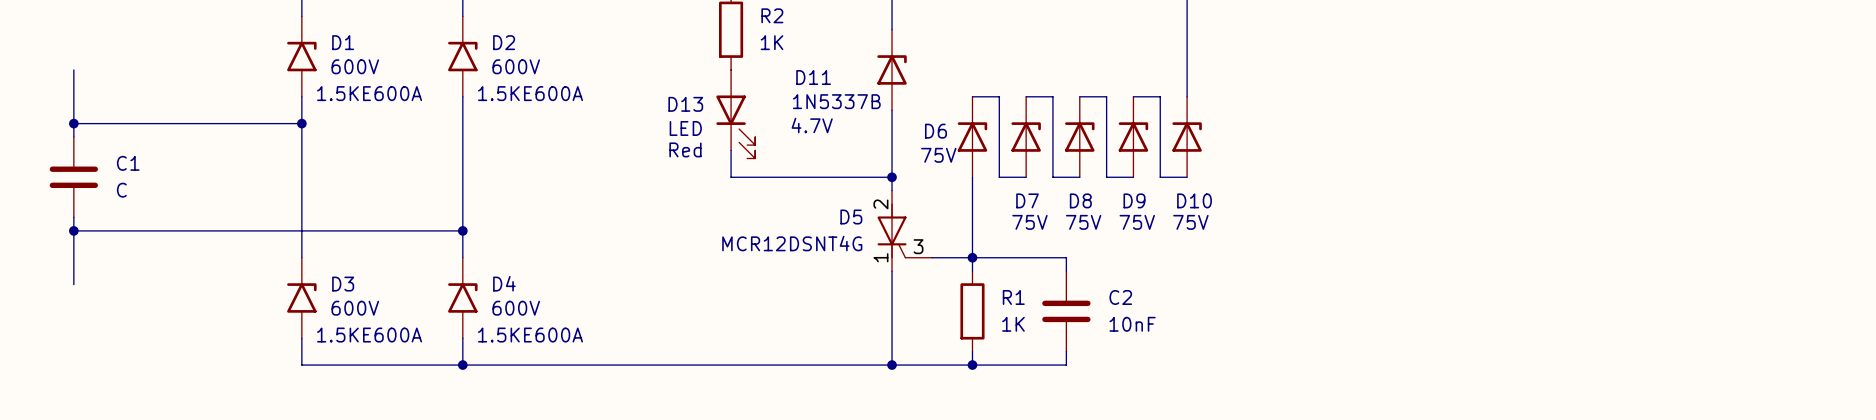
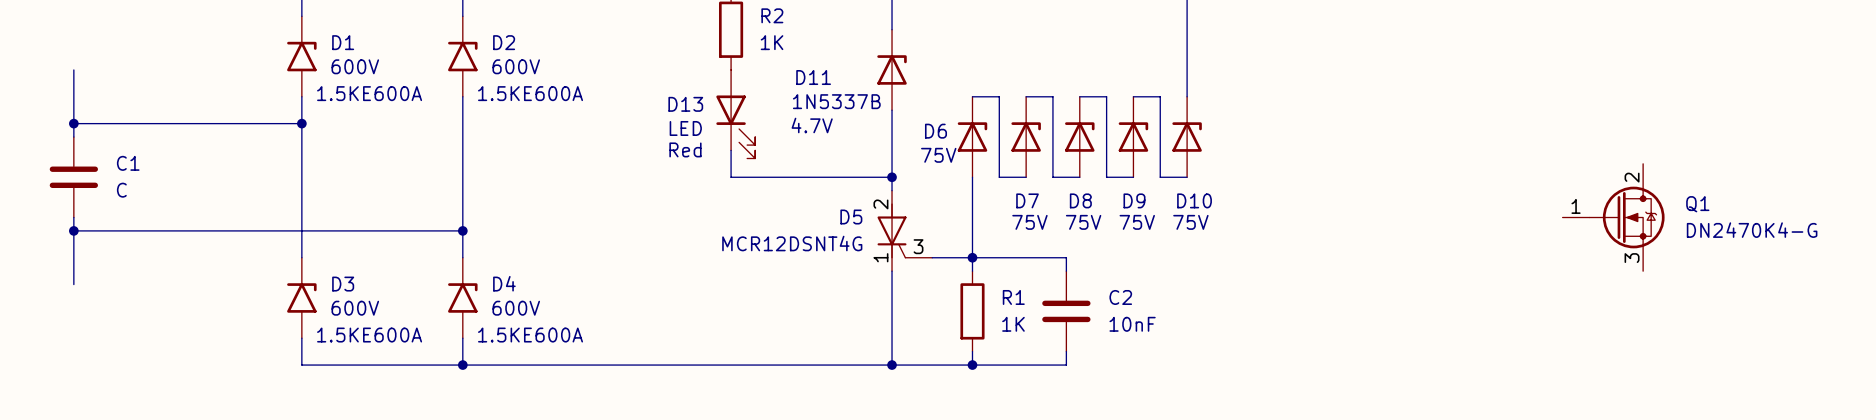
Q1: none -> DN2470K4-G (1613, 217)

